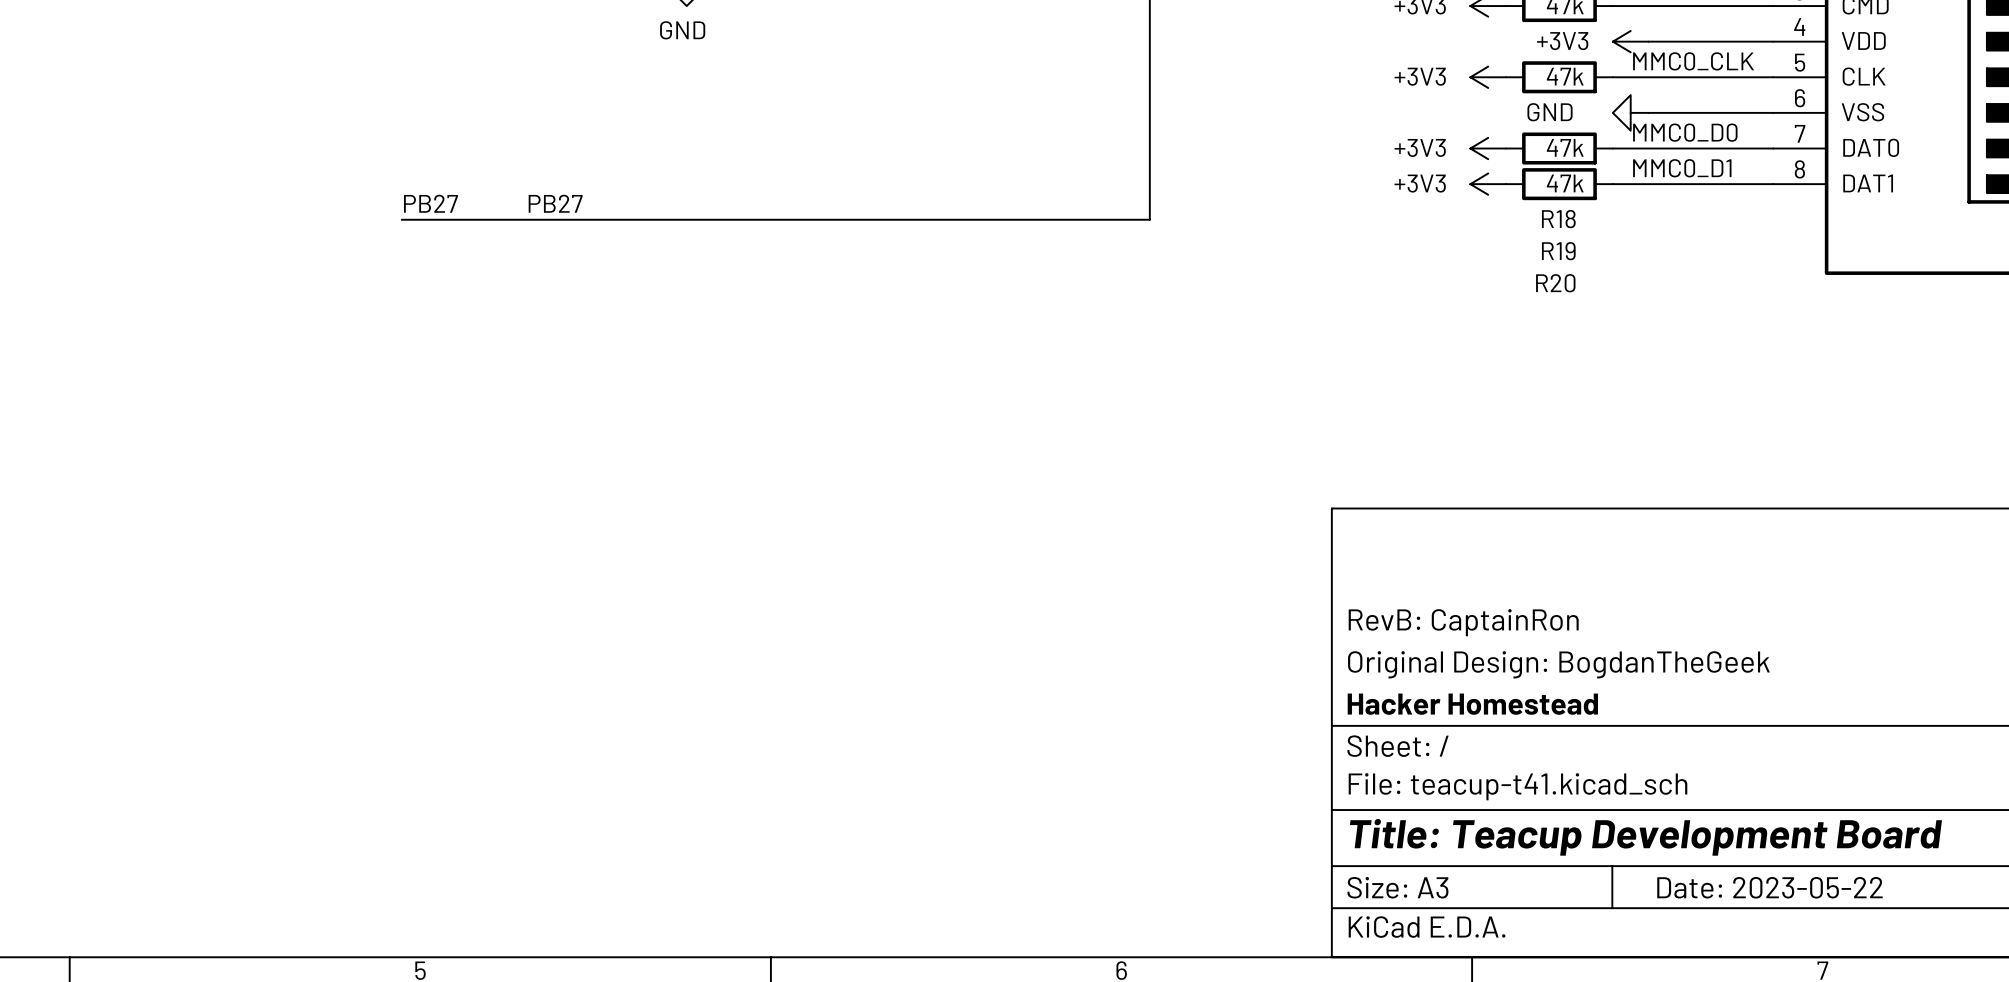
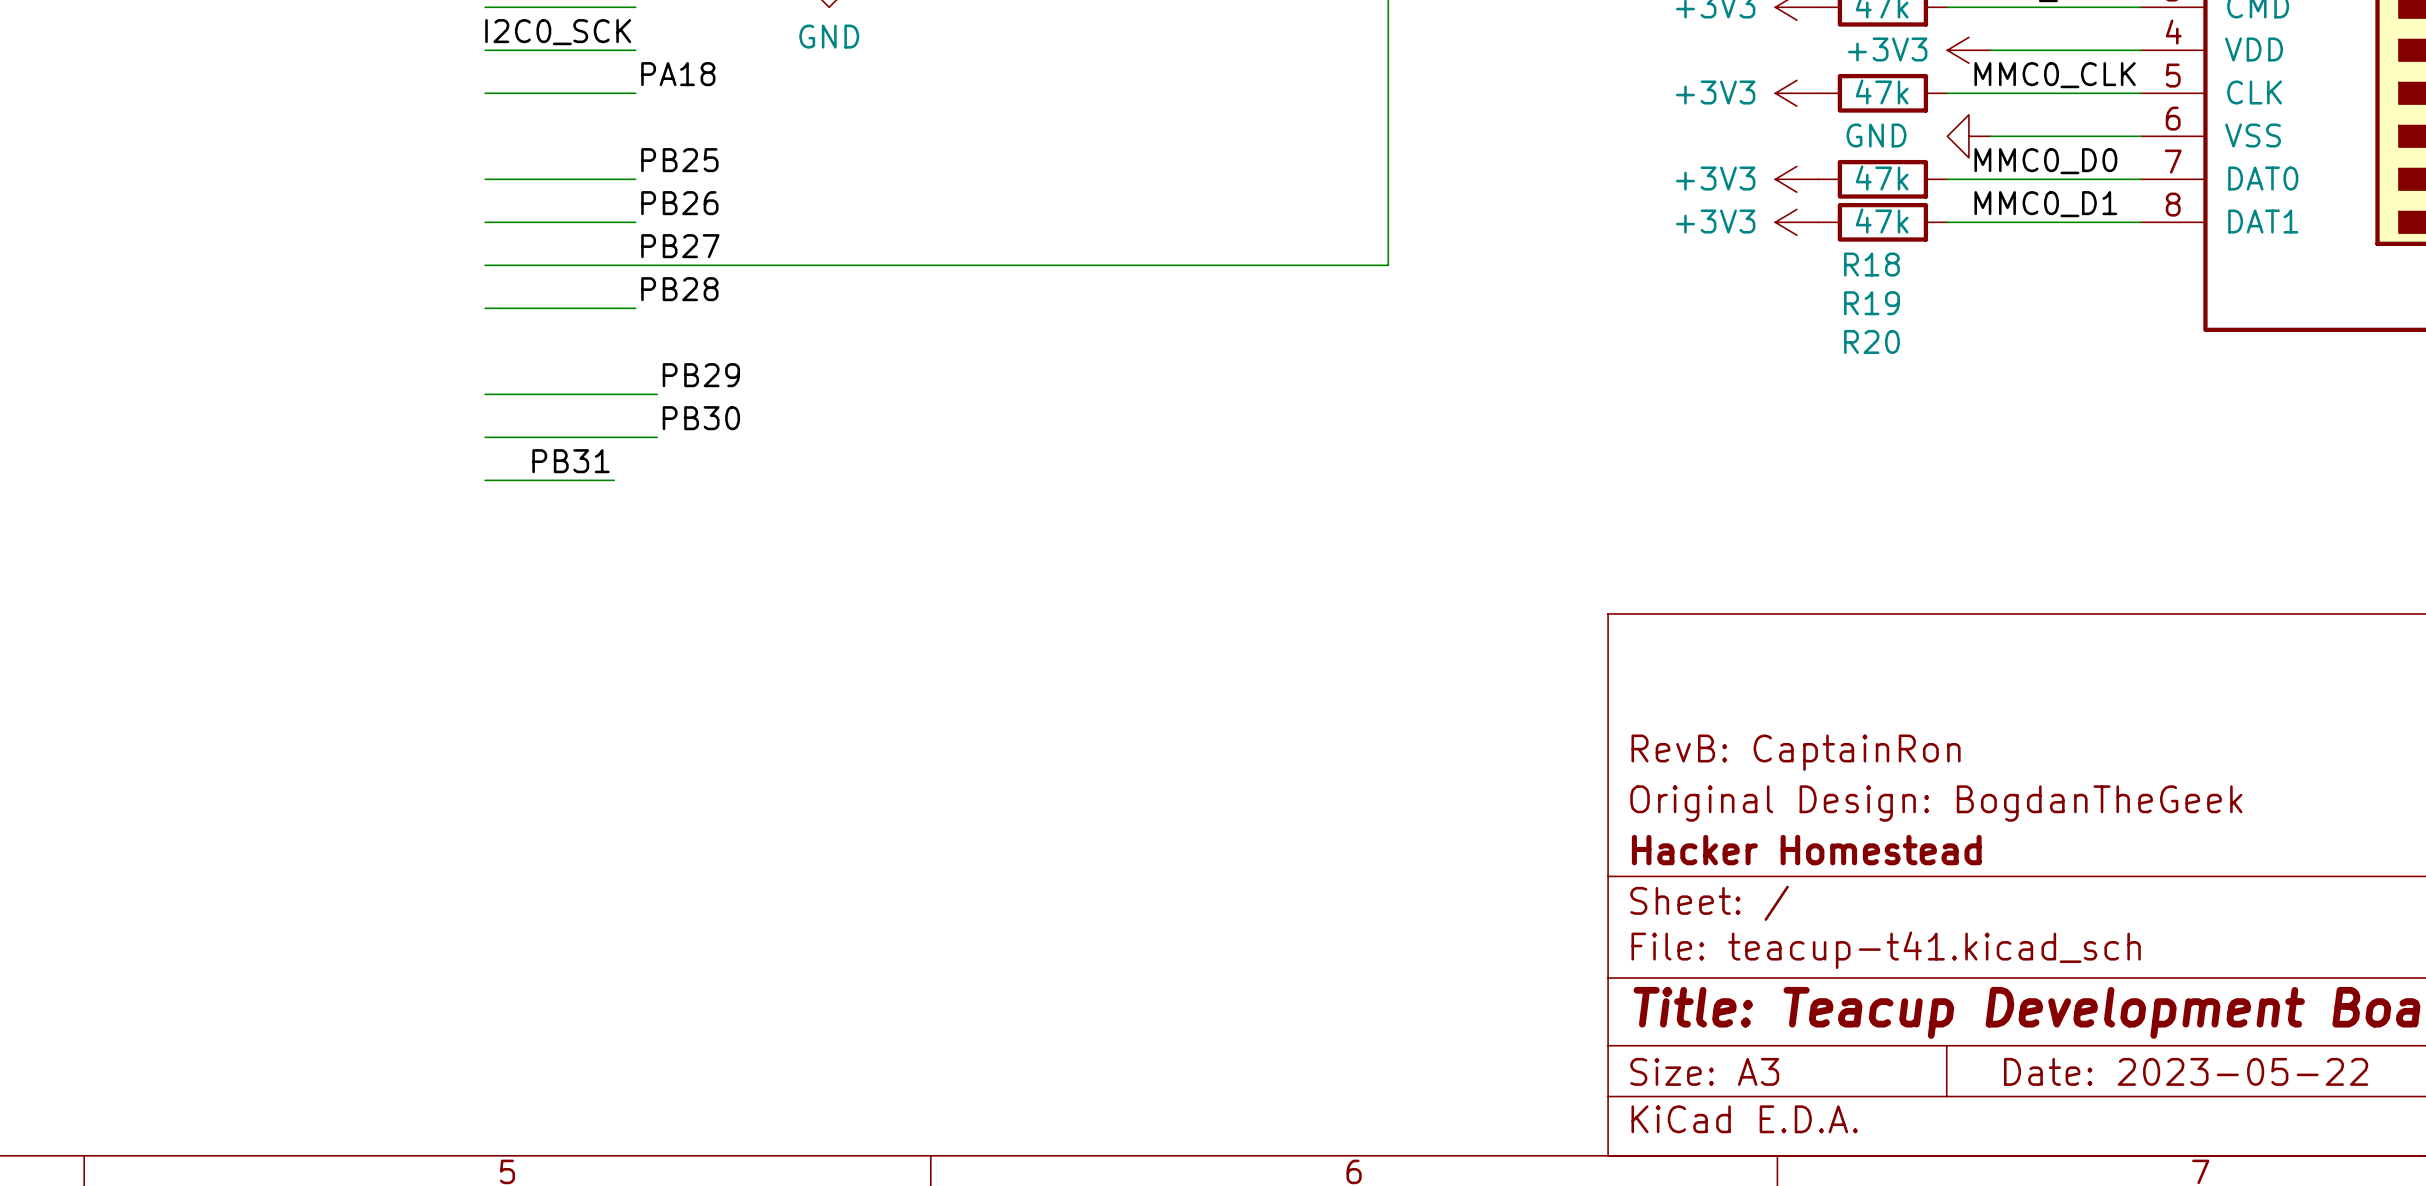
wire: none -> (485, 7) (635, 7)
label: none -> I2C0_SCK (558, 32)
wire: none -> (485, 50) (635, 50)
label: none -> PA18 (678, 74)
wire: none -> (485, 93) (635, 93)
label: none -> PB25 (679, 160)
wire: none -> (485, 179) (635, 179)
label: none -> PB26 (679, 203)
wire: none -> (485, 222) (635, 222)
label: PB27 (430, 203) -> none
label: none -> PB28 (679, 289)
wire: none -> (485, 308) (635, 308)
label: none -> PB29 (701, 375)
wire: none -> (485, 394) (657, 394)
label: none -> PB30 (701, 418)
wire: none -> (485, 437) (657, 437)
label: none -> PB31 (570, 461)
wire: none -> (485, 480) (614, 480)

